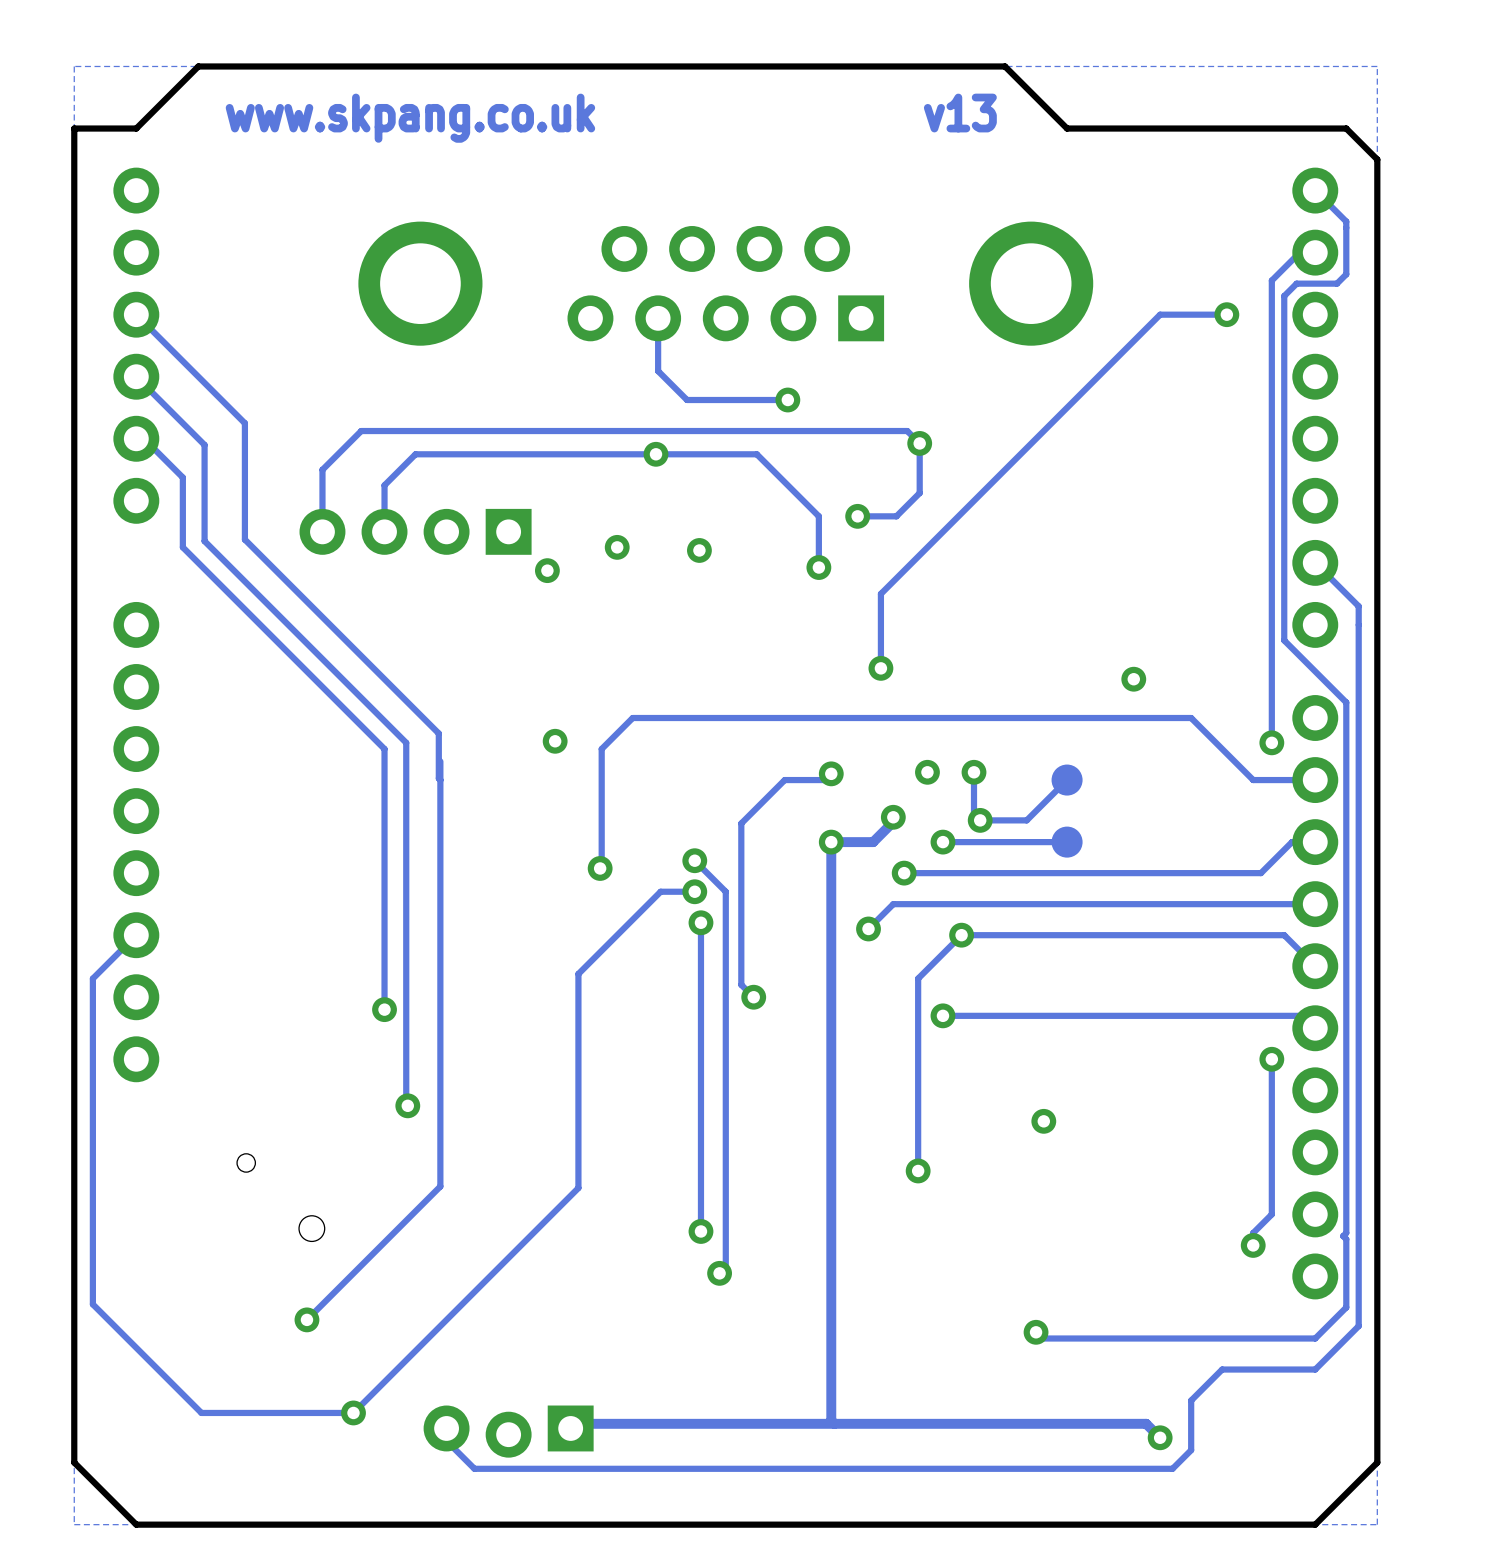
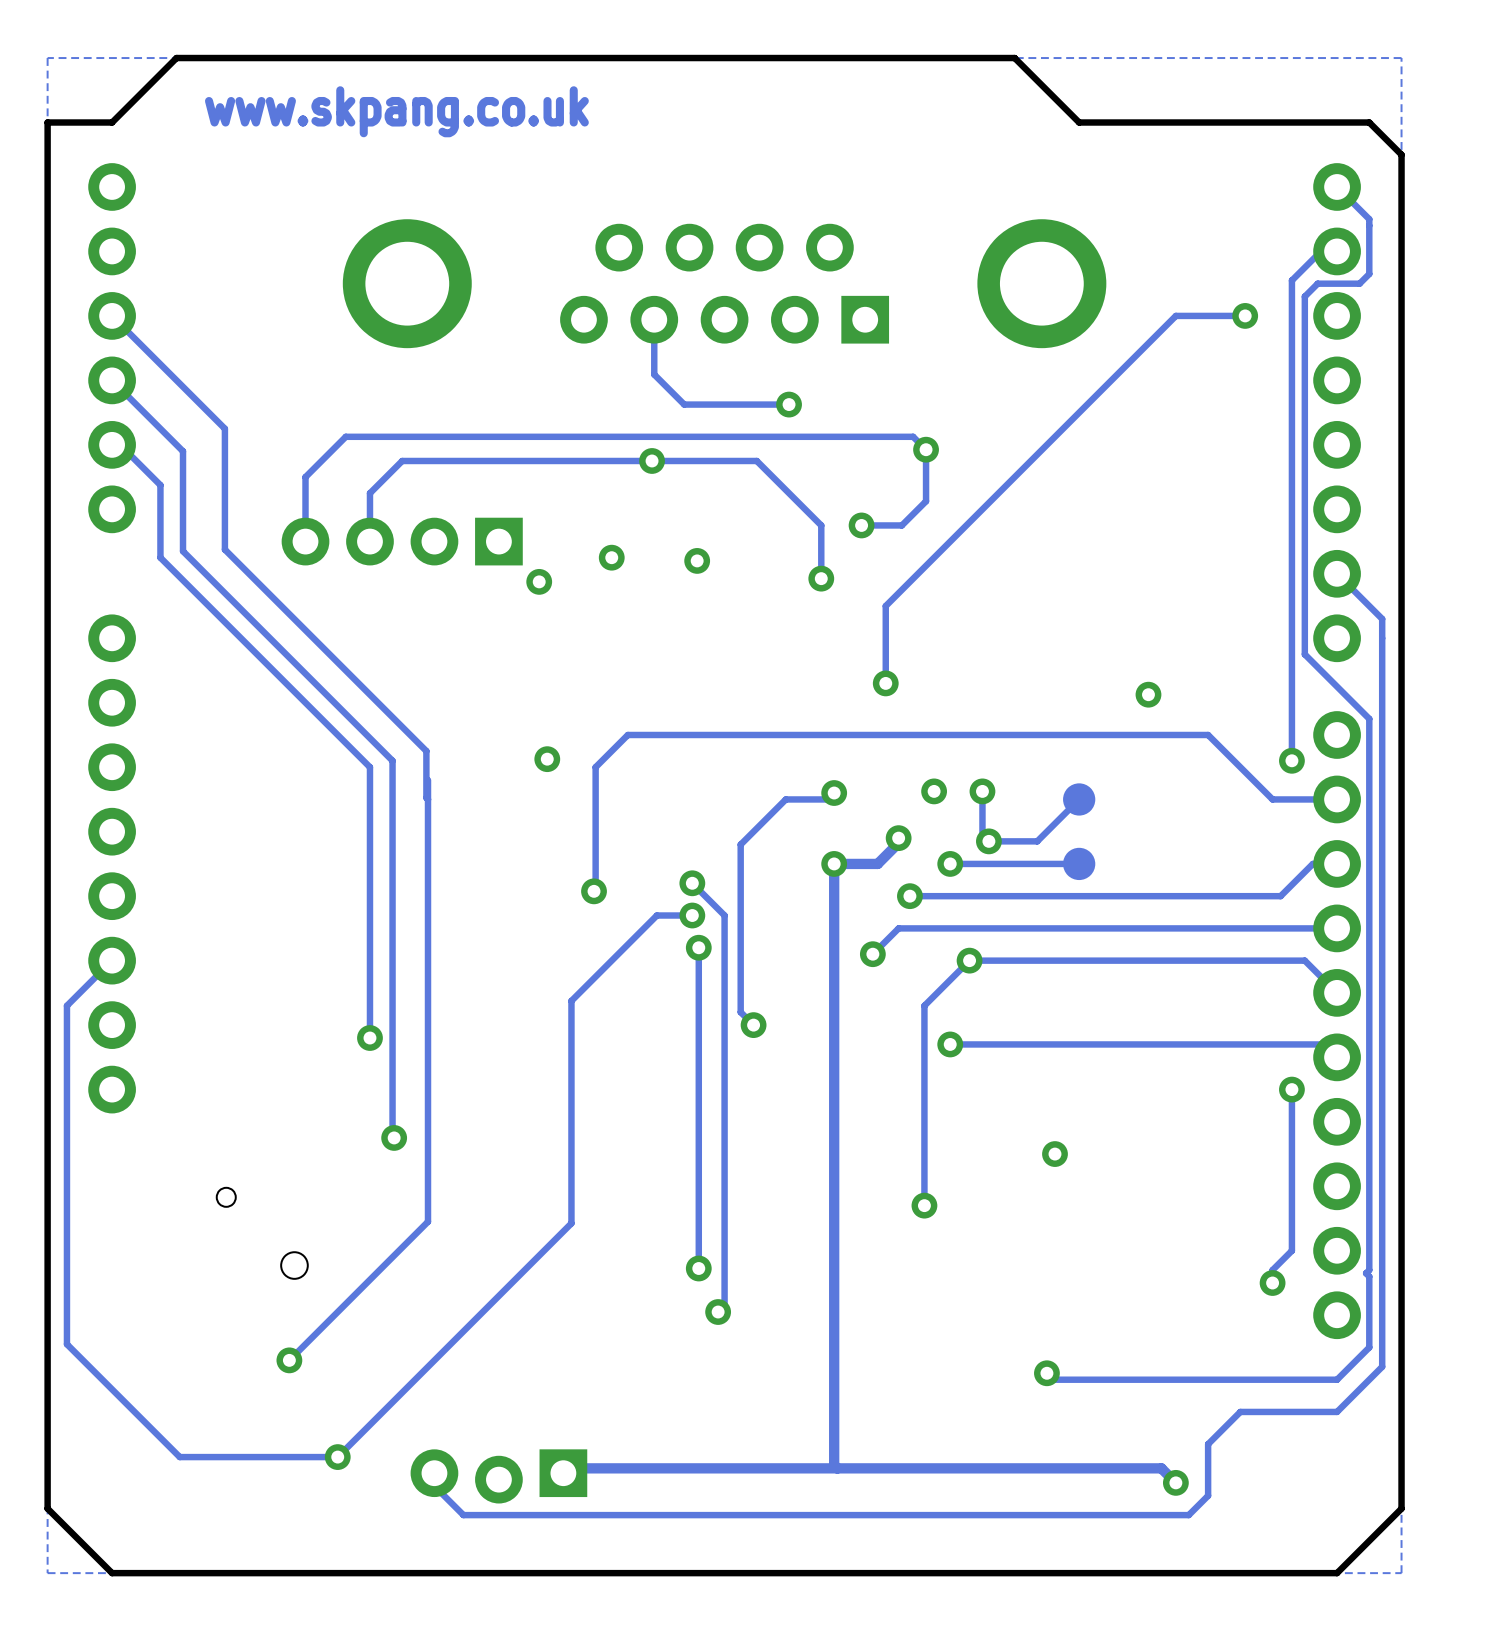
drawing: [923, 93, 997, 133] -> none

